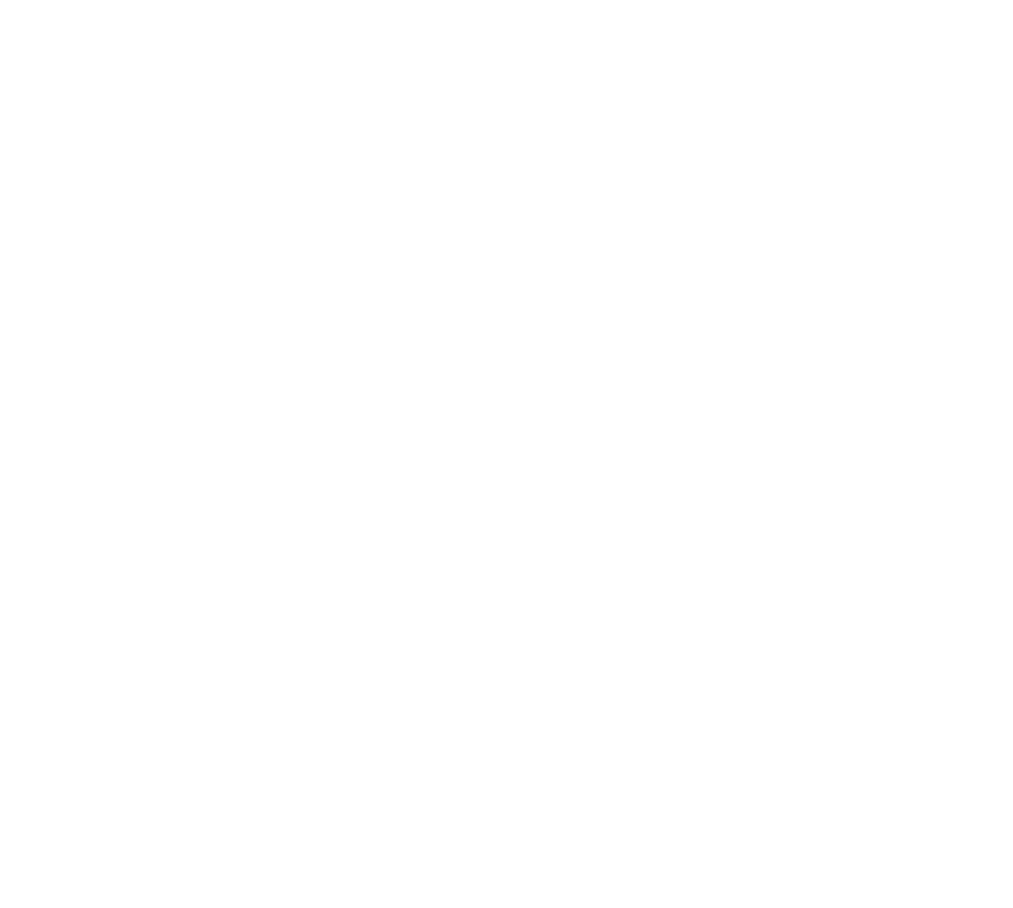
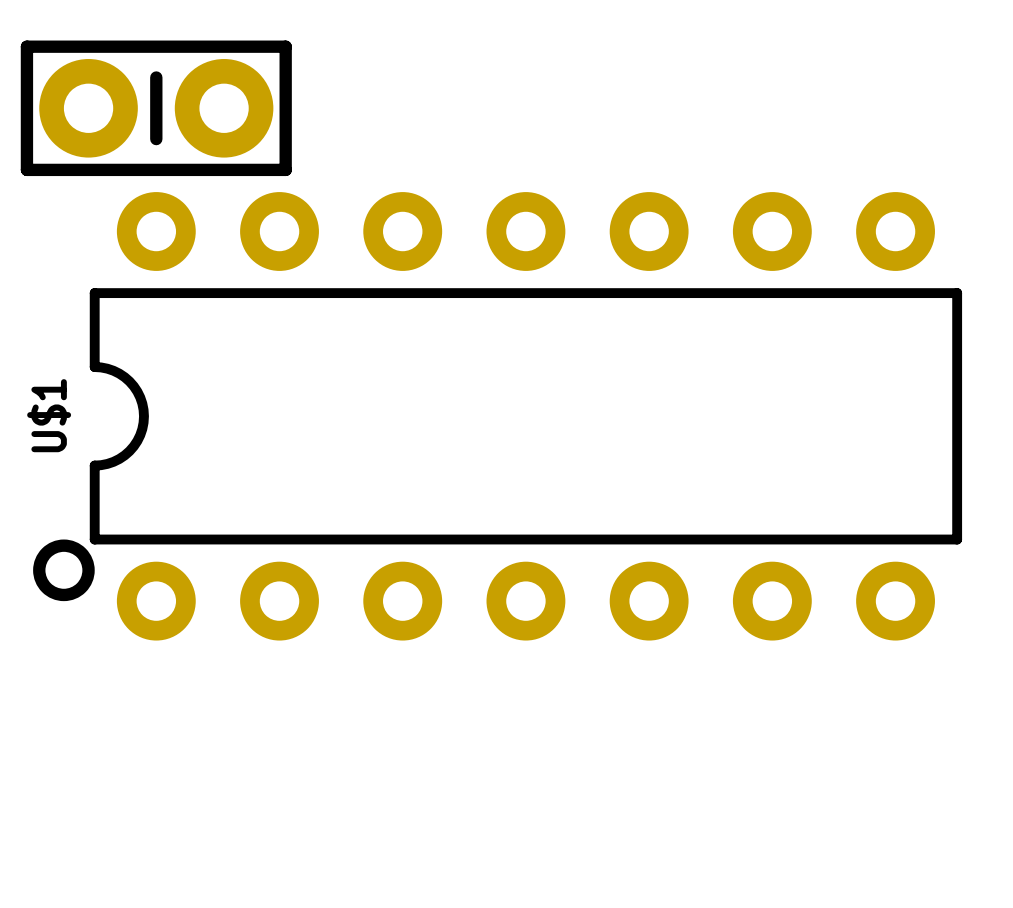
part: none -> (156, 108)
U$1: none -> (497, 416)

